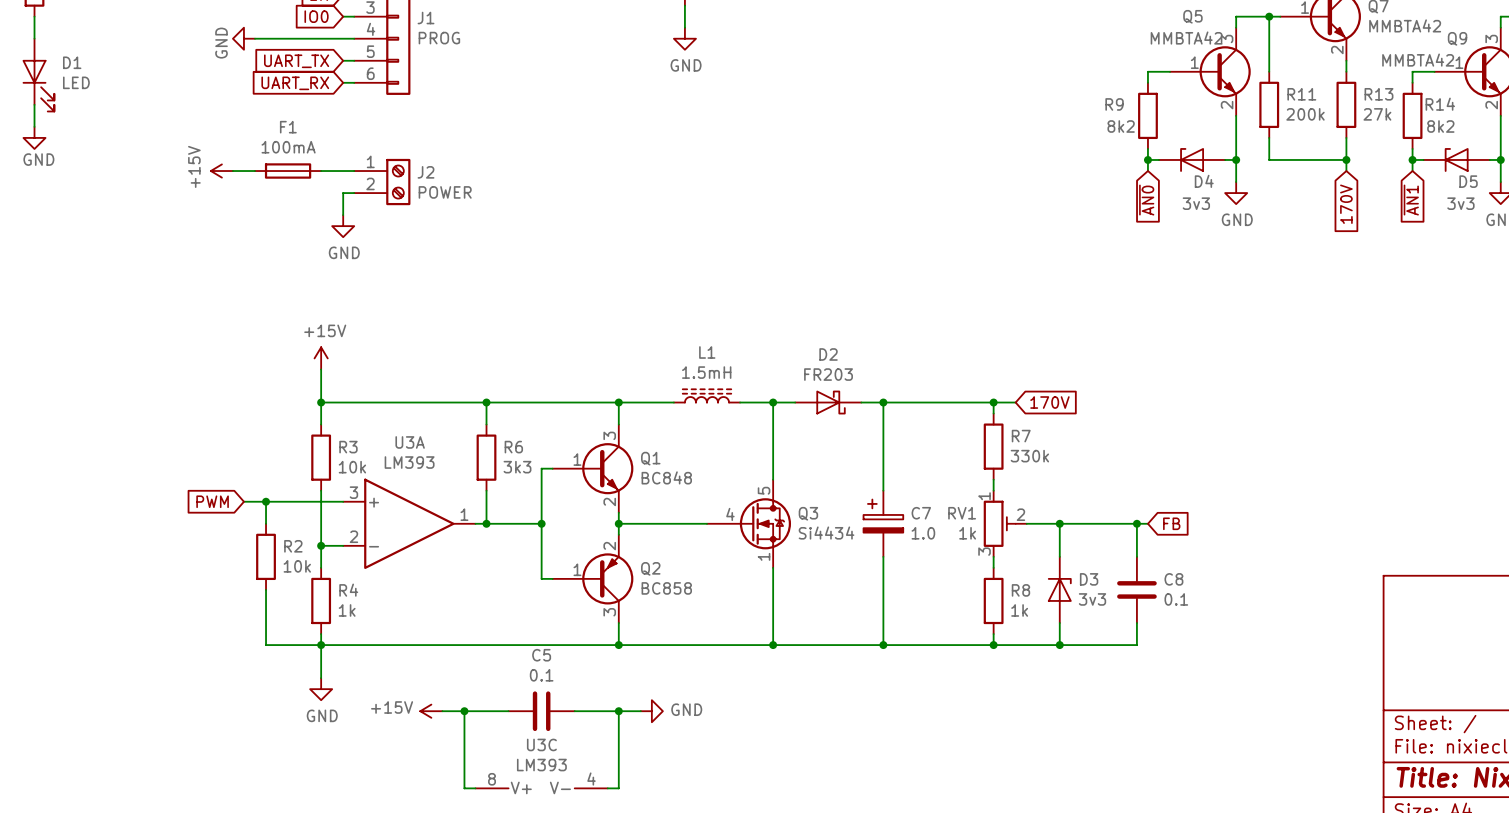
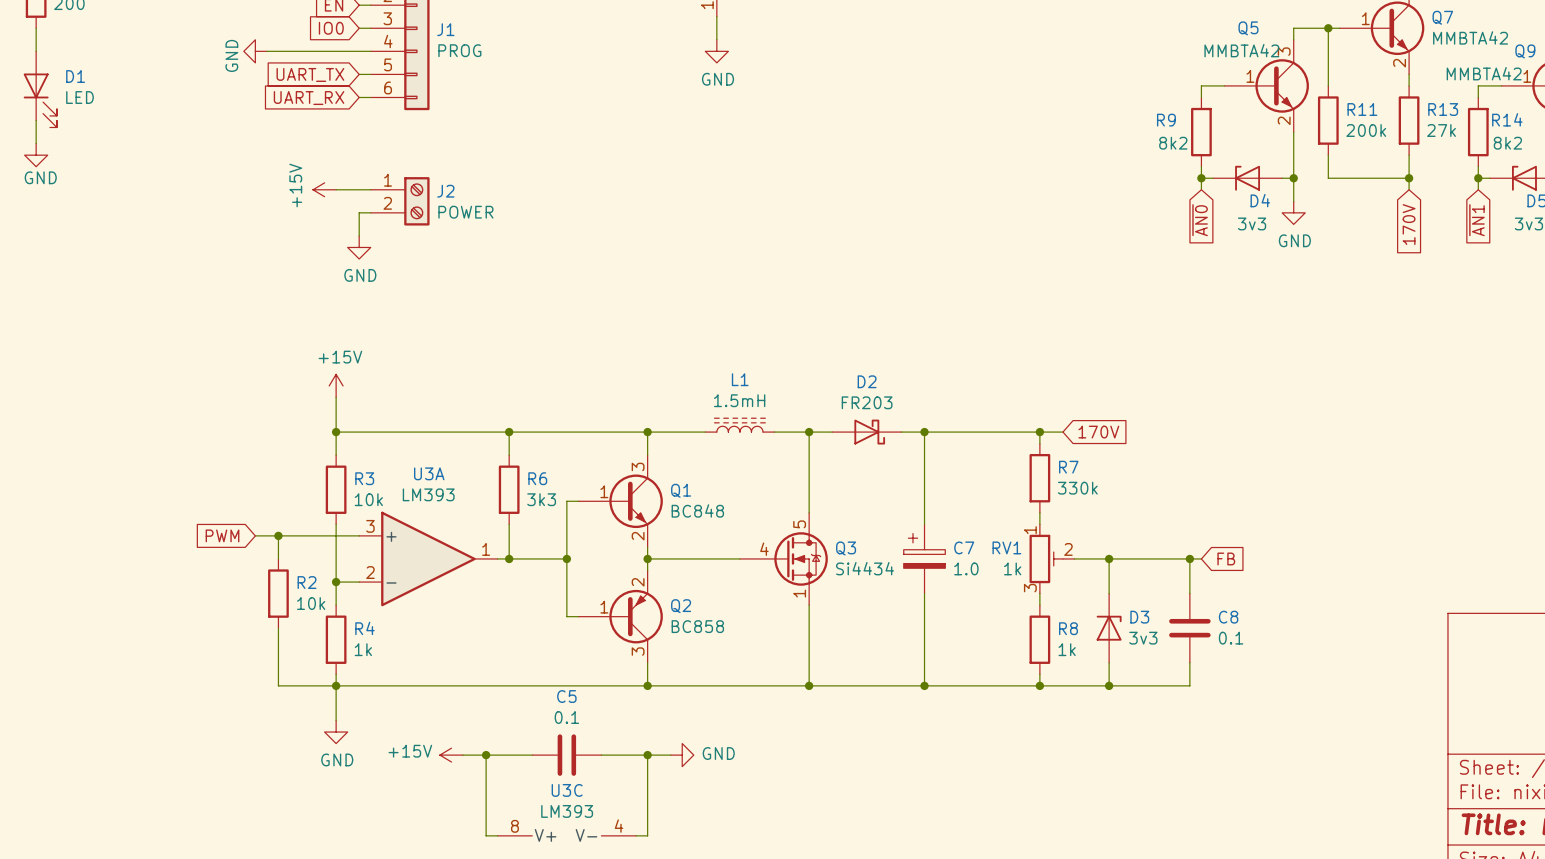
power symbol position: +15V (221, 171) -> +15V (324, 189)
wire: (232, 171) (254, 171) -> none
F1: 100mA (288, 171) -> none

